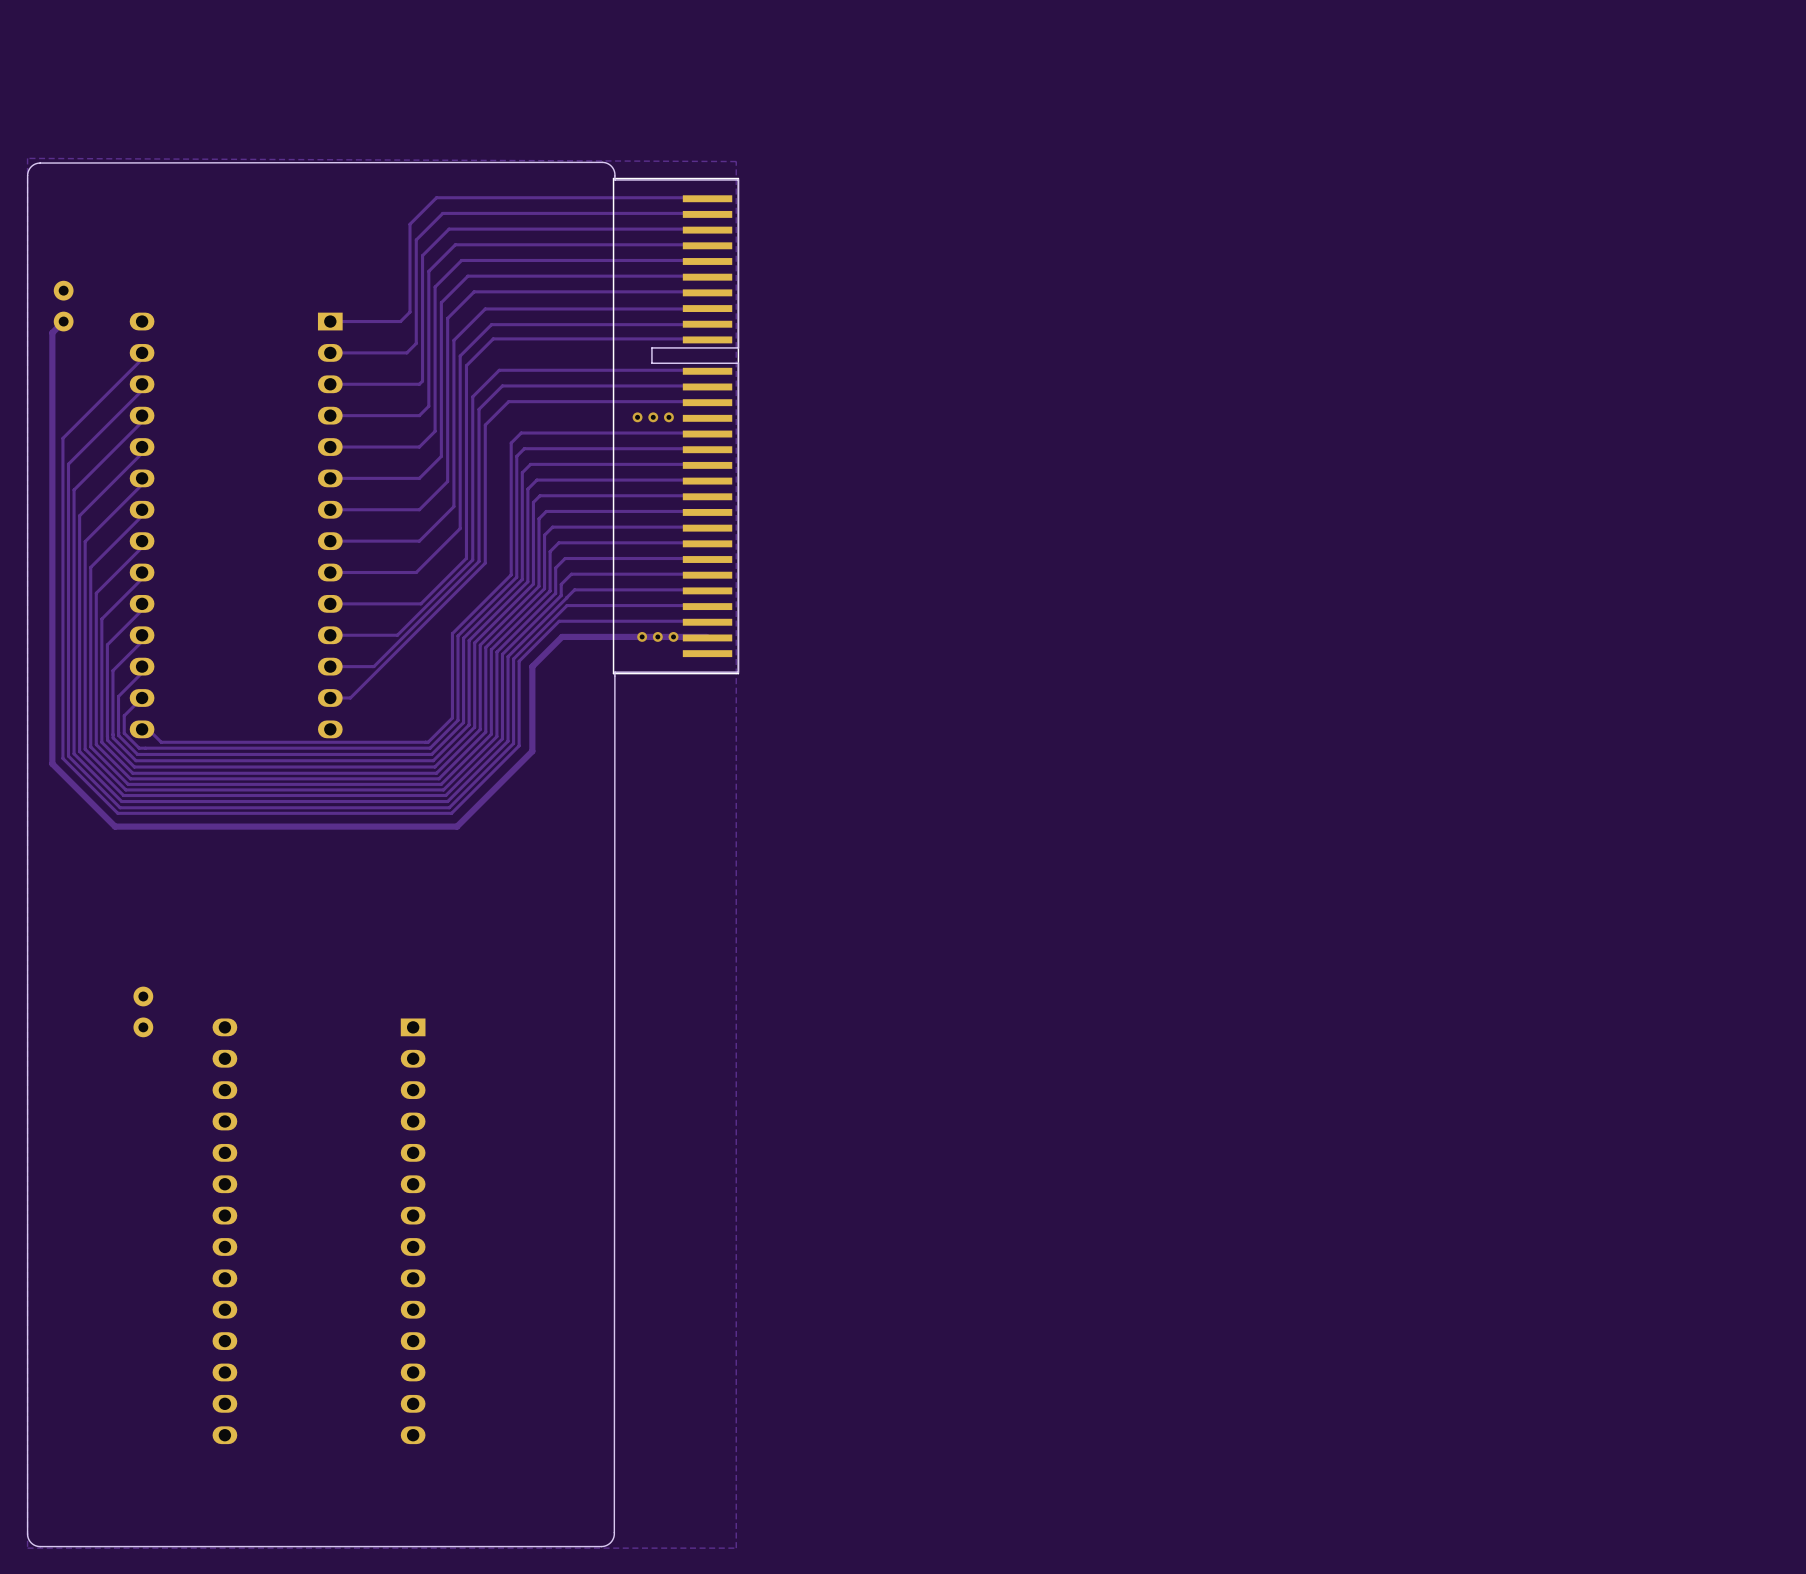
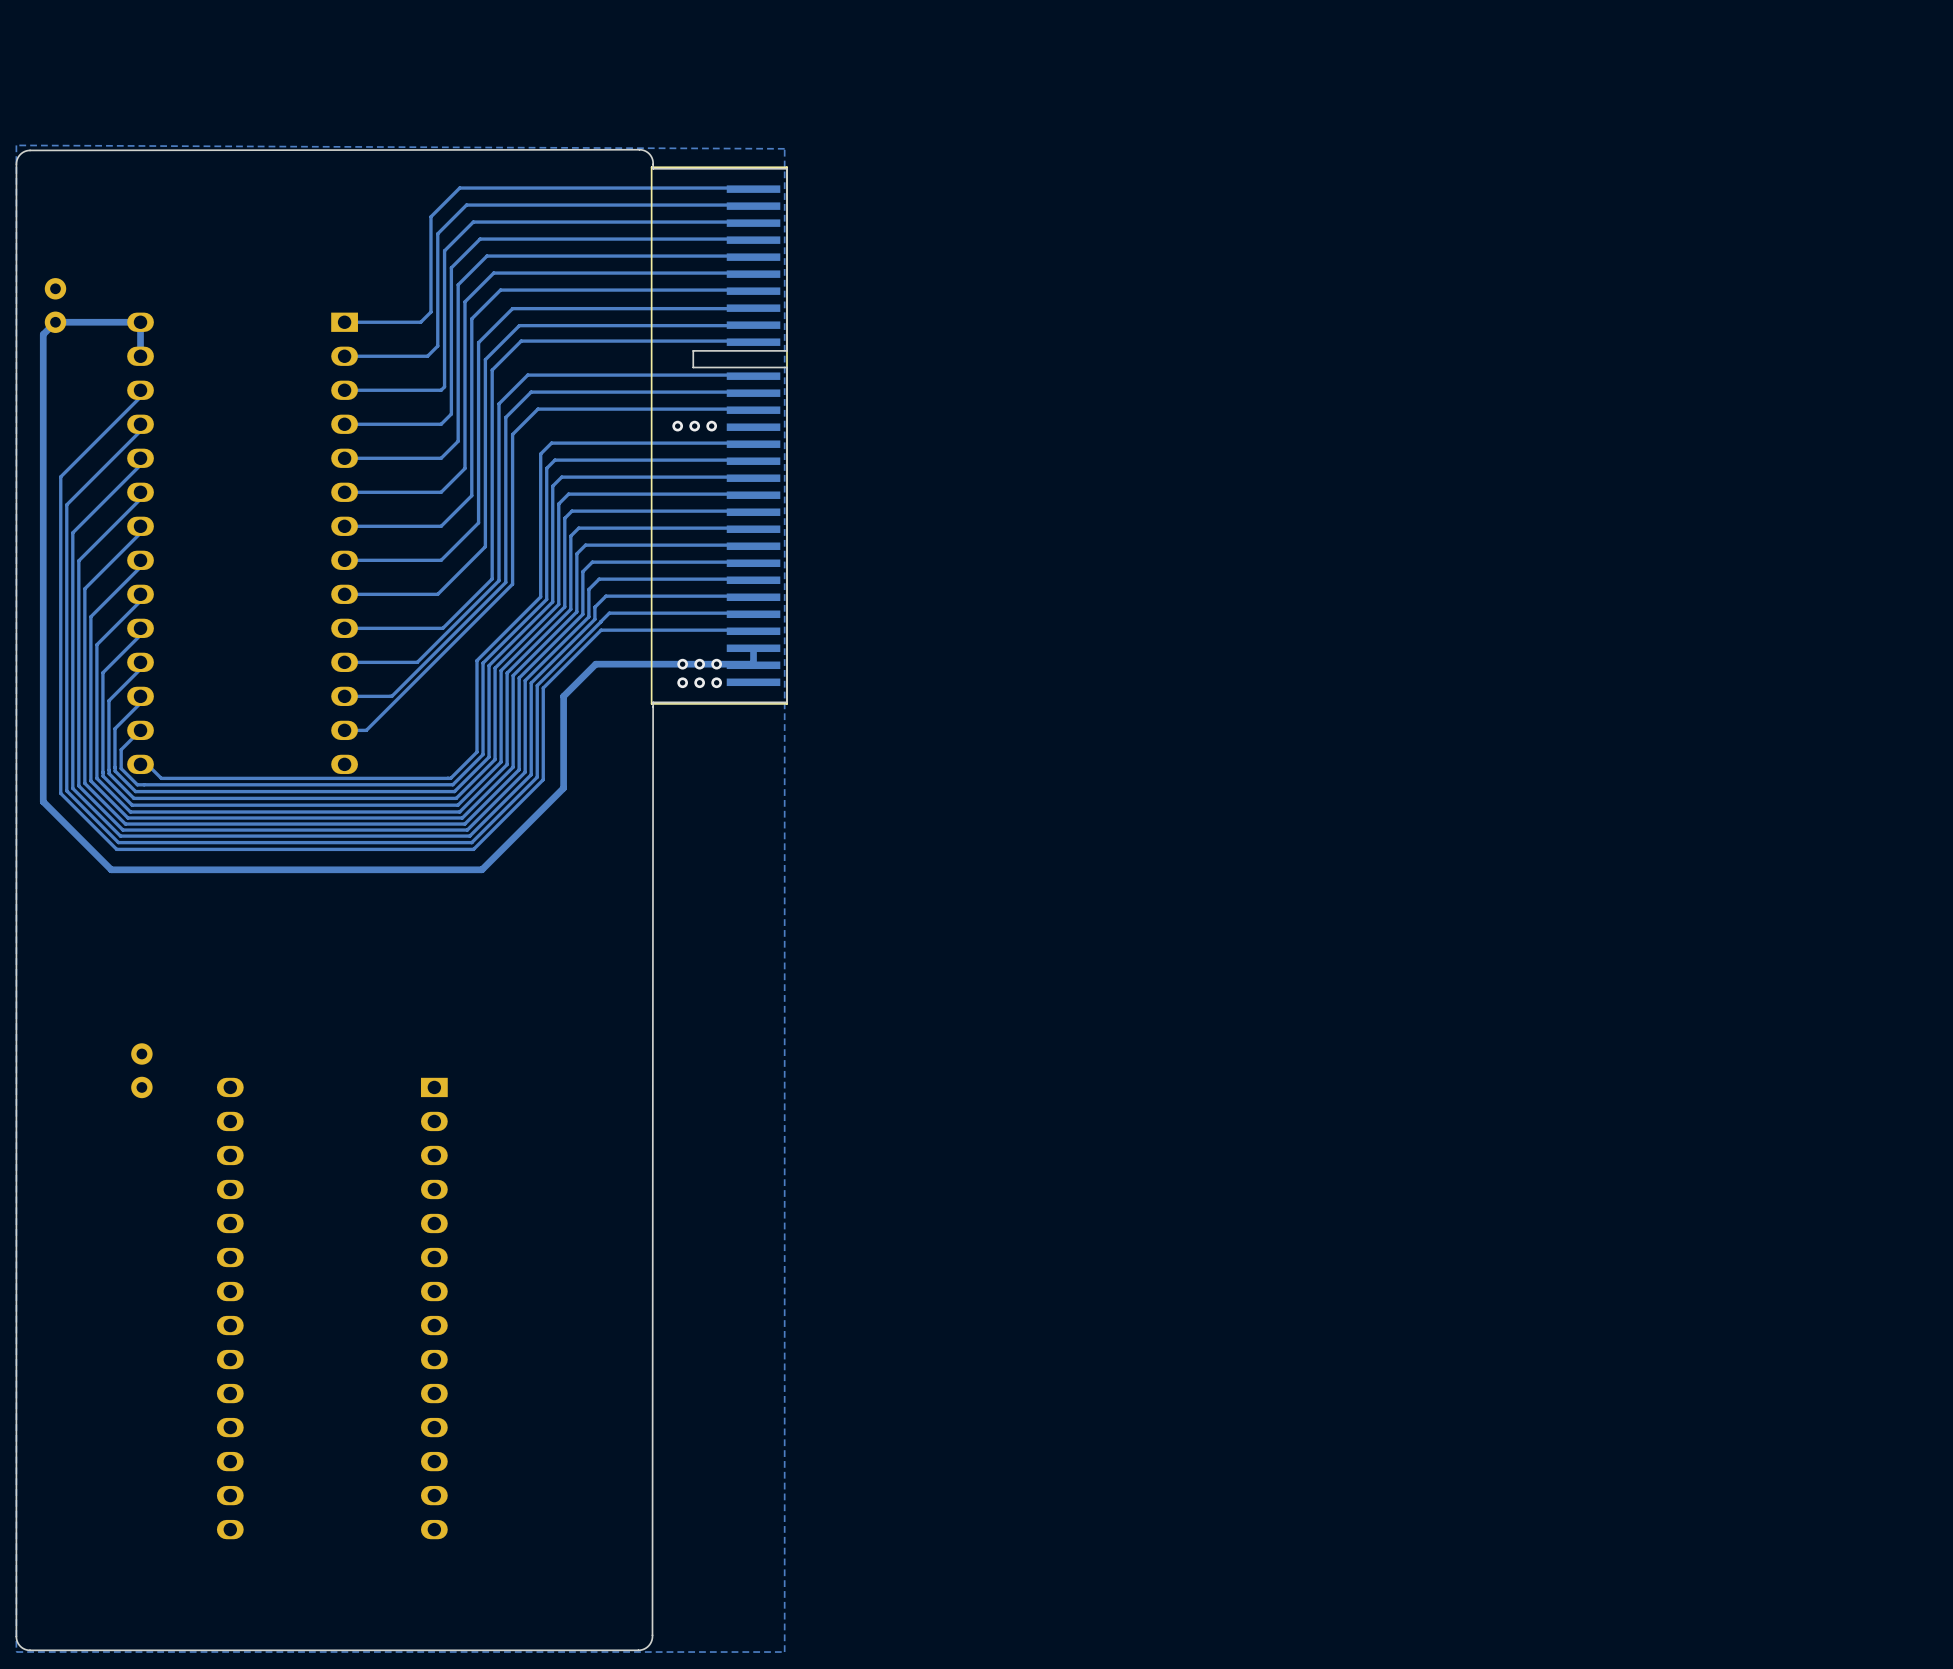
track: none -> (55, 322) (140, 322) (140, 356)
track: (148, 352) (62, 438) (62, 758) (117, 813) (451, 813) (519, 745) (519, 661) (559, 621) (707, 621) -> none
track: none -> (753, 648) (753, 665)
via: none -> (682, 682)
via: none -> (699, 682)
via: none -> (716, 682)

